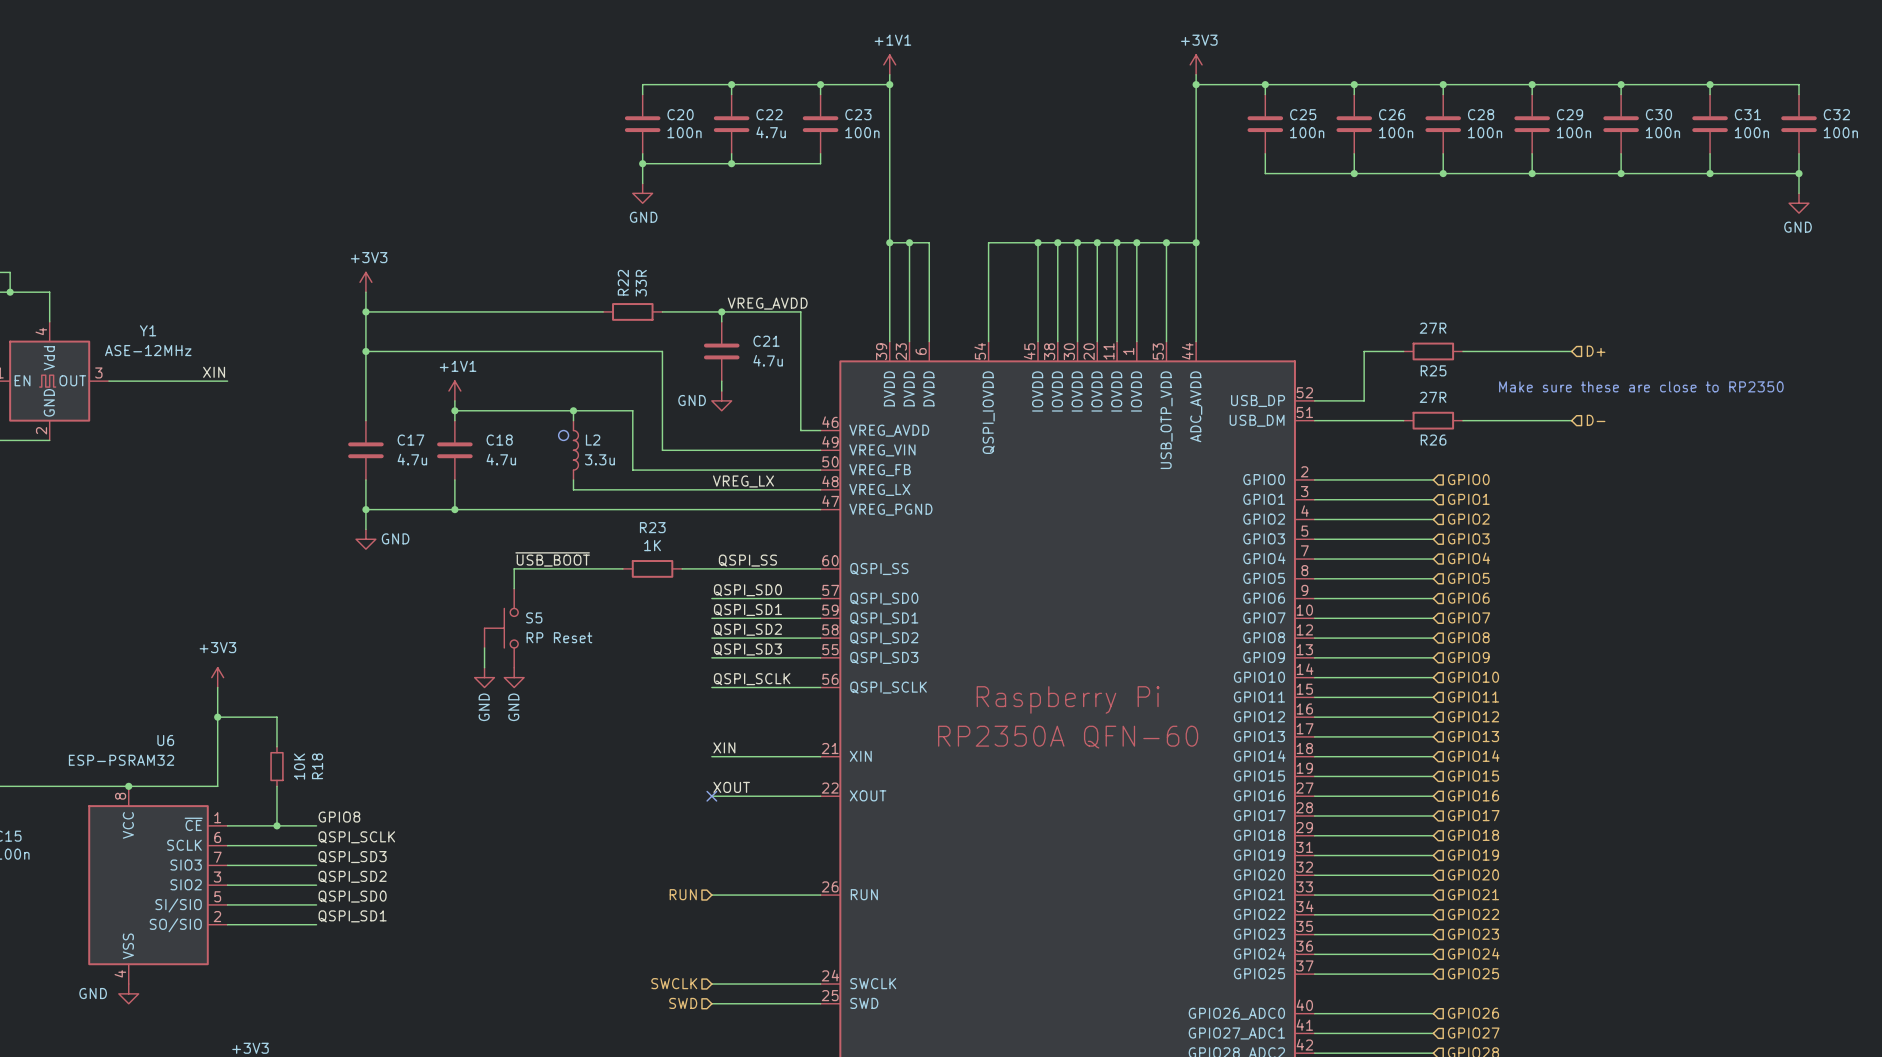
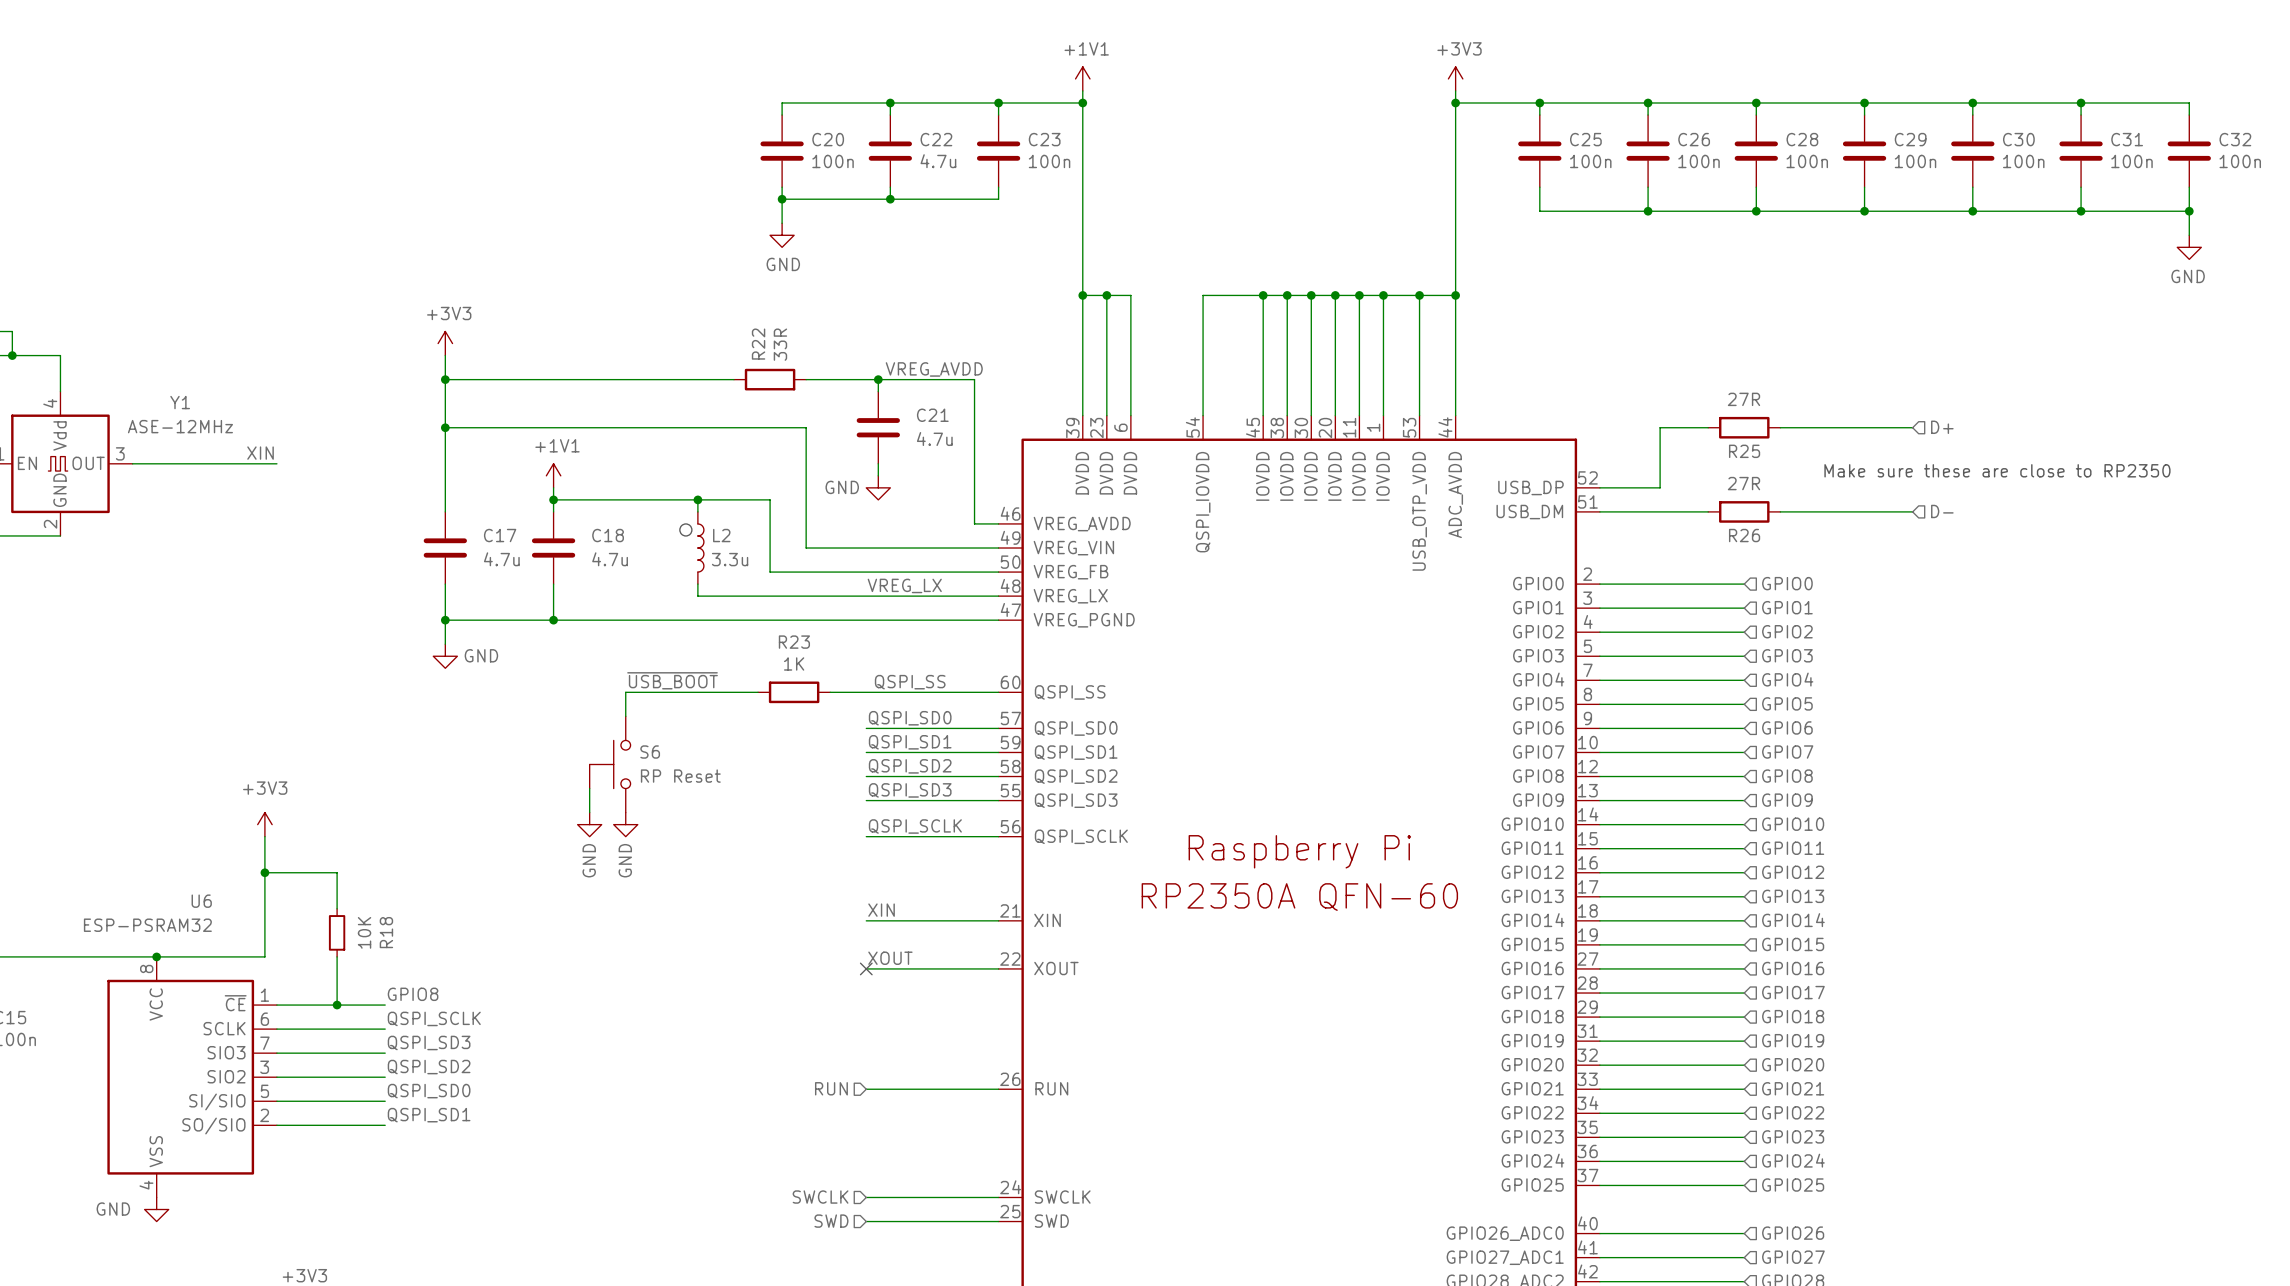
S5 name: S5 (534, 617) -> S6 (650, 752)

